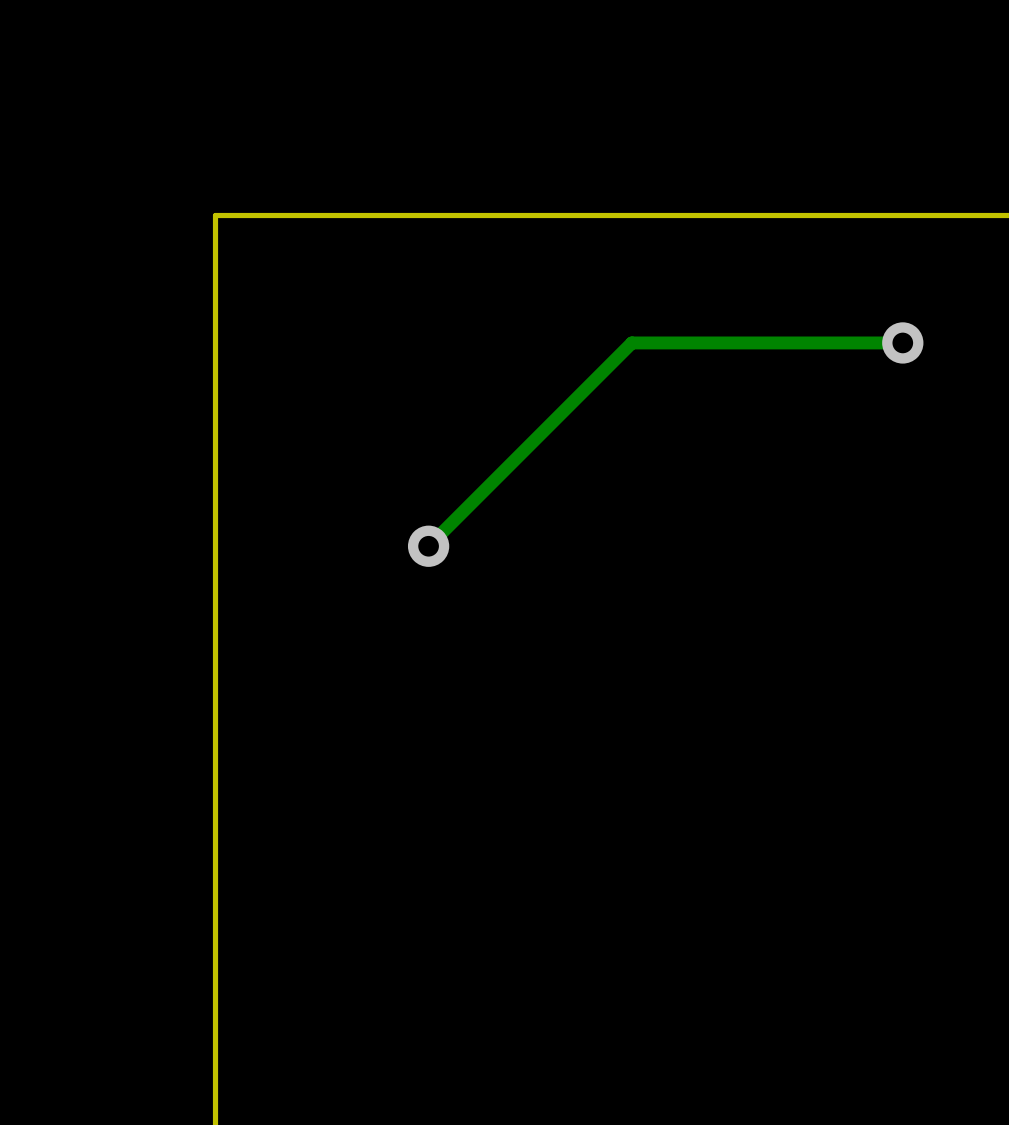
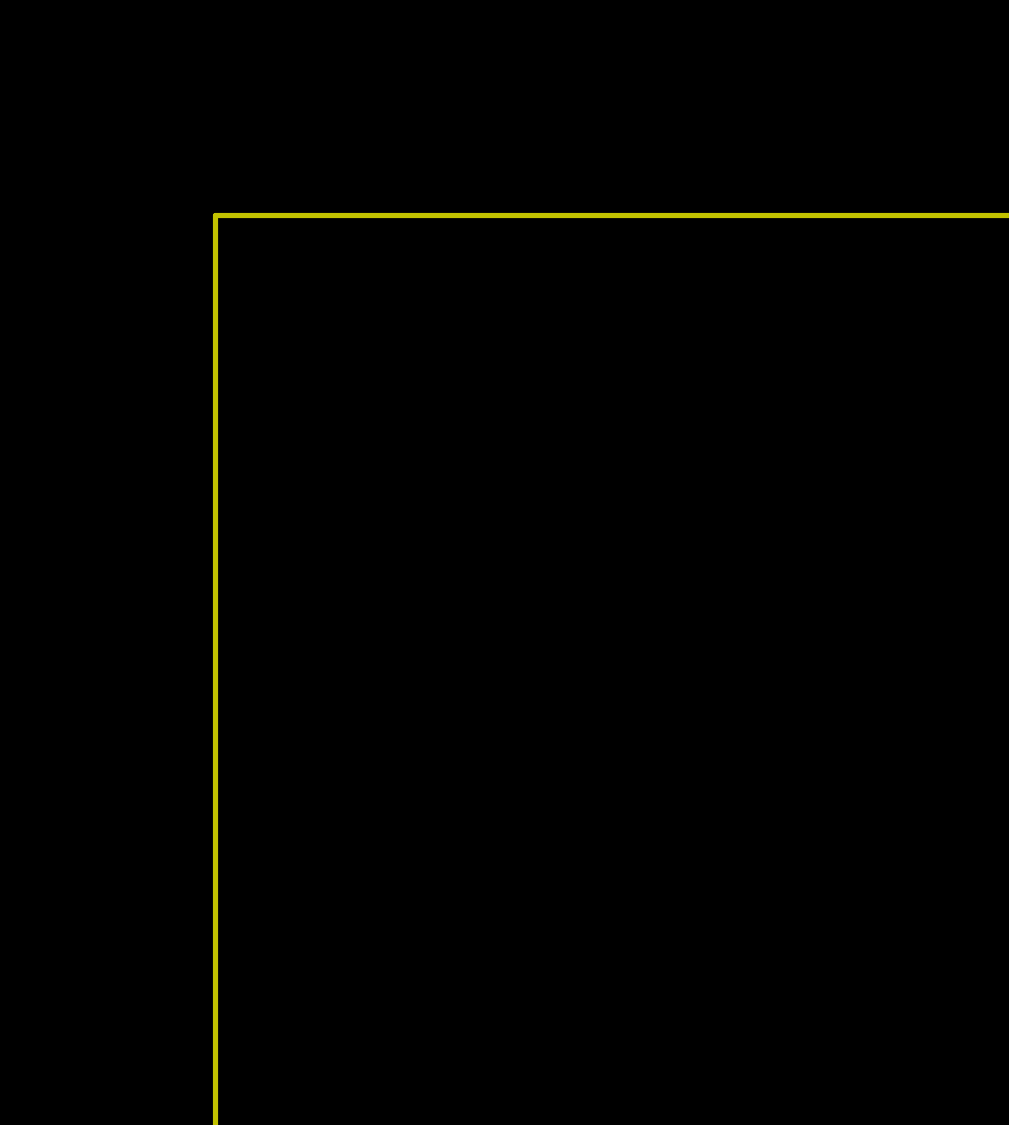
track: (902, 342) (631, 342) (428, 546) -> none
via: (902, 342) -> none
via: (428, 546) -> none

